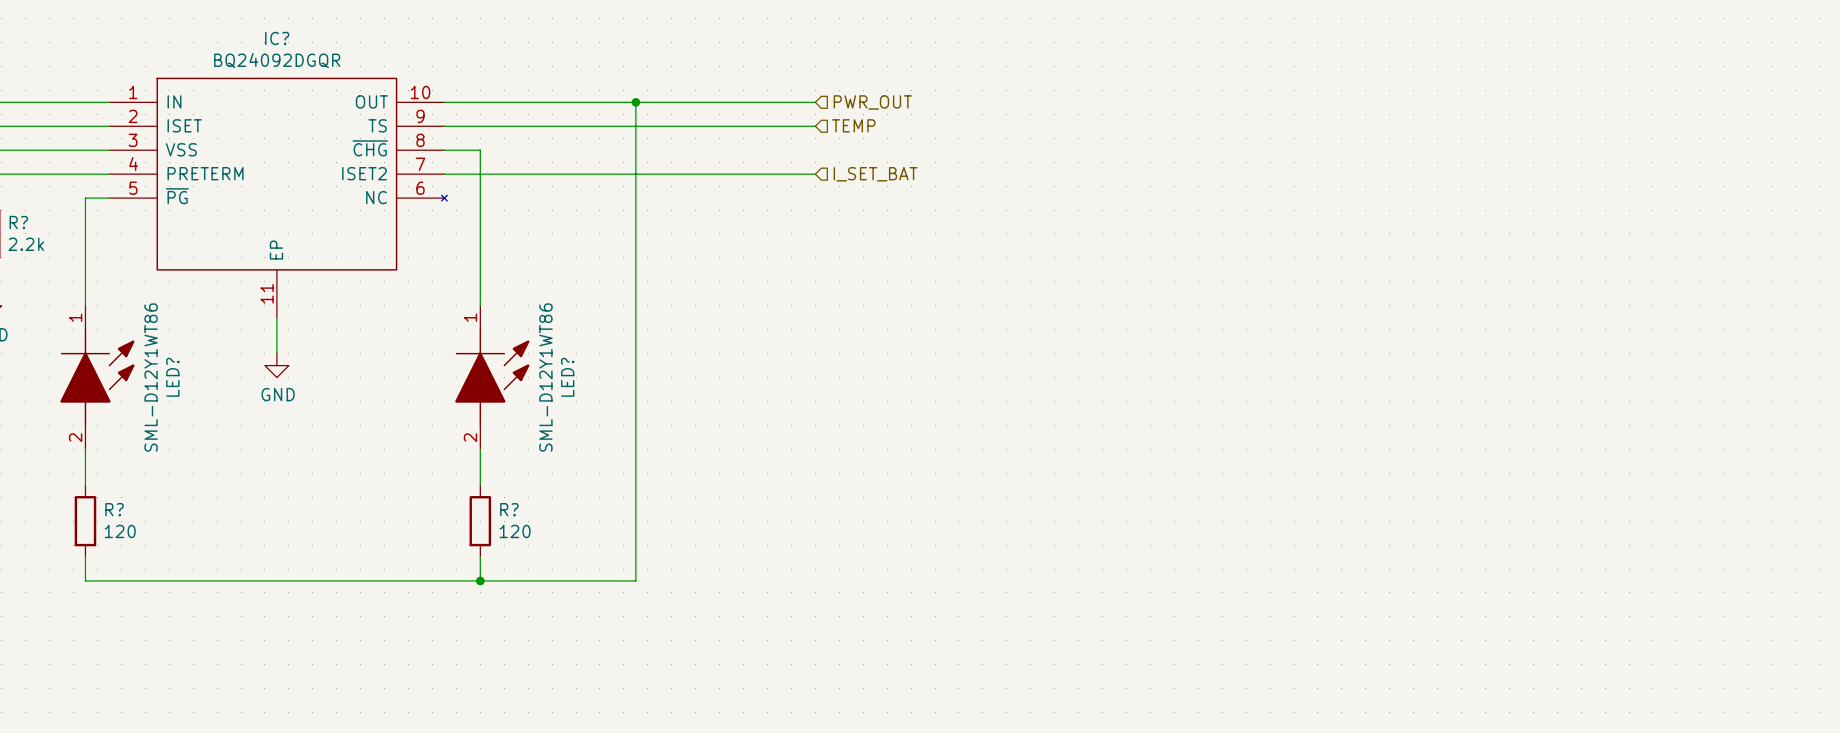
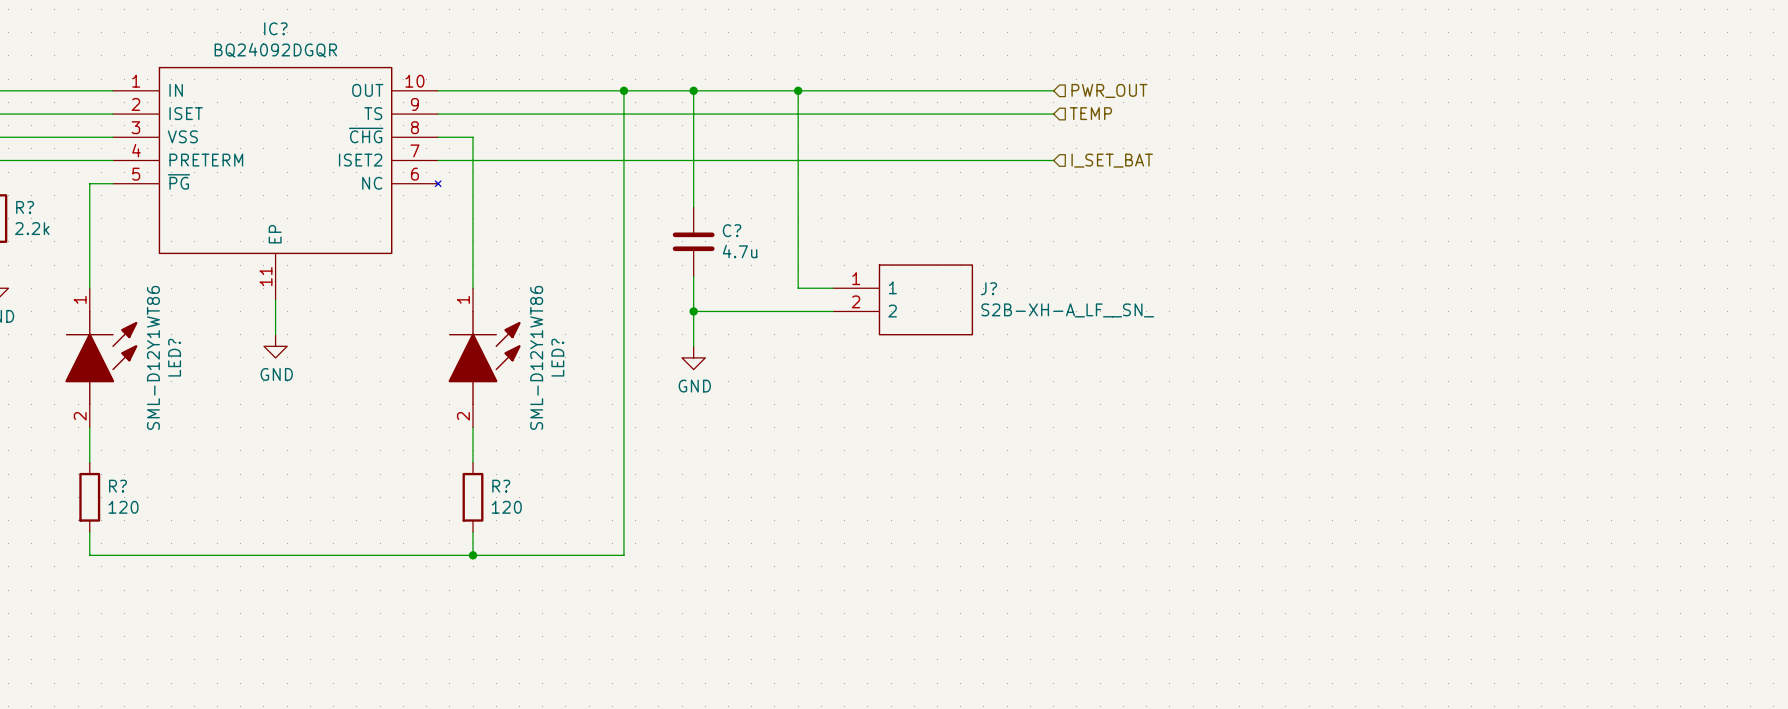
wire: none -> (693, 90) (693, 206)
junction: none -> (693, 90)
junction: none -> (798, 90)
hierarchical label: PWR_OUT (872, 102) -> none
wire: none -> (1053, 90) (798, 90) (798, 288) (833, 288)
hierarchical label: none -> PWR_OUT (1109, 90)
hierarchical label: TEMP (853, 125) -> none
hierarchical label: none -> TEMP (1090, 113)
wire: none -> (798, 114) (1053, 114)
wire: none -> (798, 160) (1053, 160)
hierarchical label: I_SET_BAT (875, 174) -> none
hierarchical label: none -> I_SET_BAT (1112, 160)
C?: none -> 4.7u (693, 241)
wire: none -> (693, 276) (693, 346)
J?: none -> S2B-XH-A_LF__SN_ (903, 299)
wire: none -> (693, 311) (833, 311)
junction: none -> (693, 311)
power symbol: none -> GND (693, 357)

